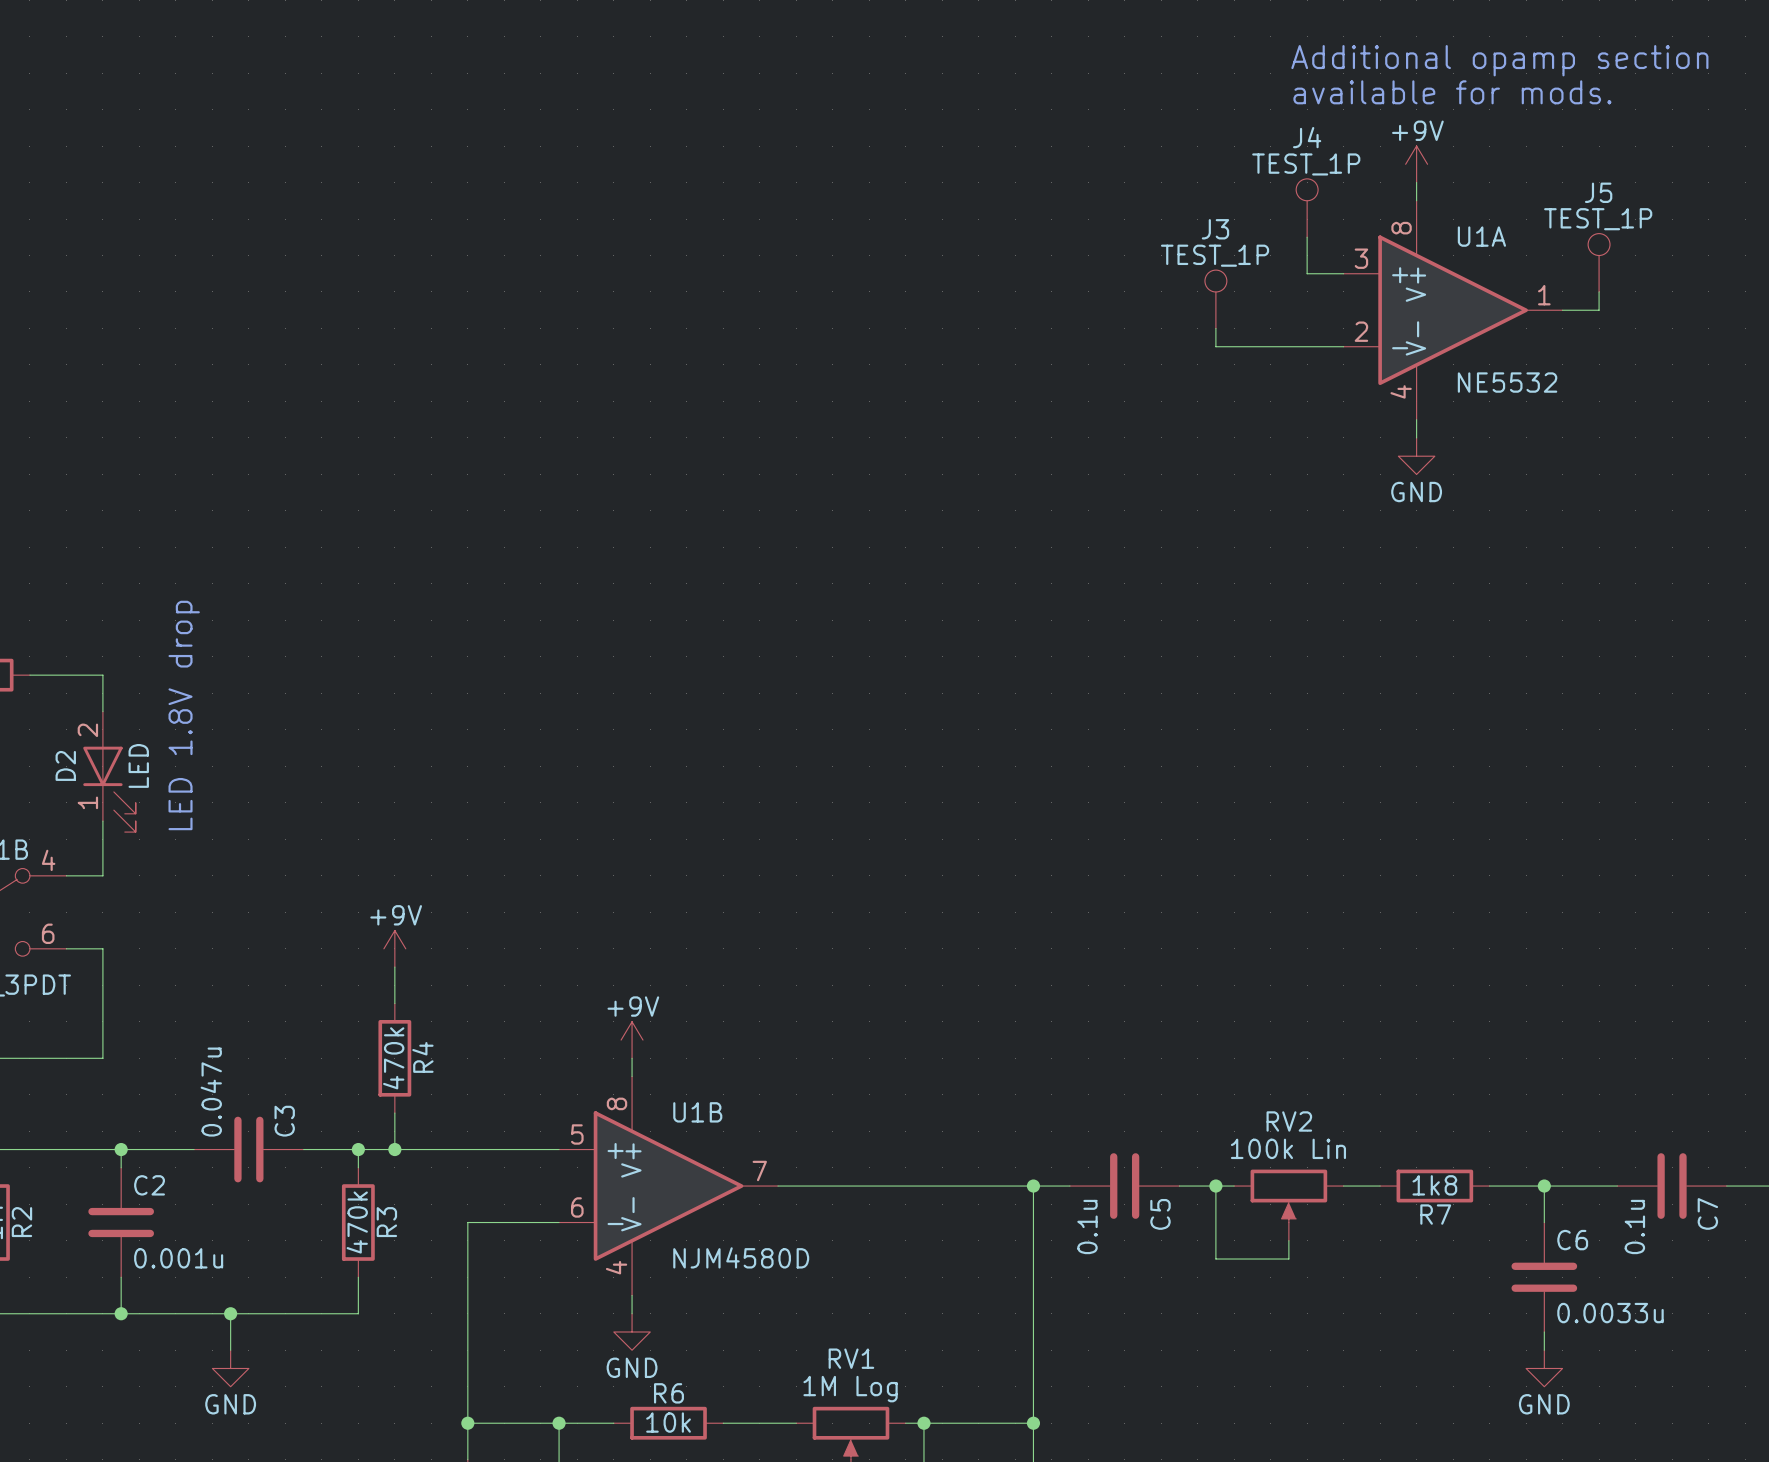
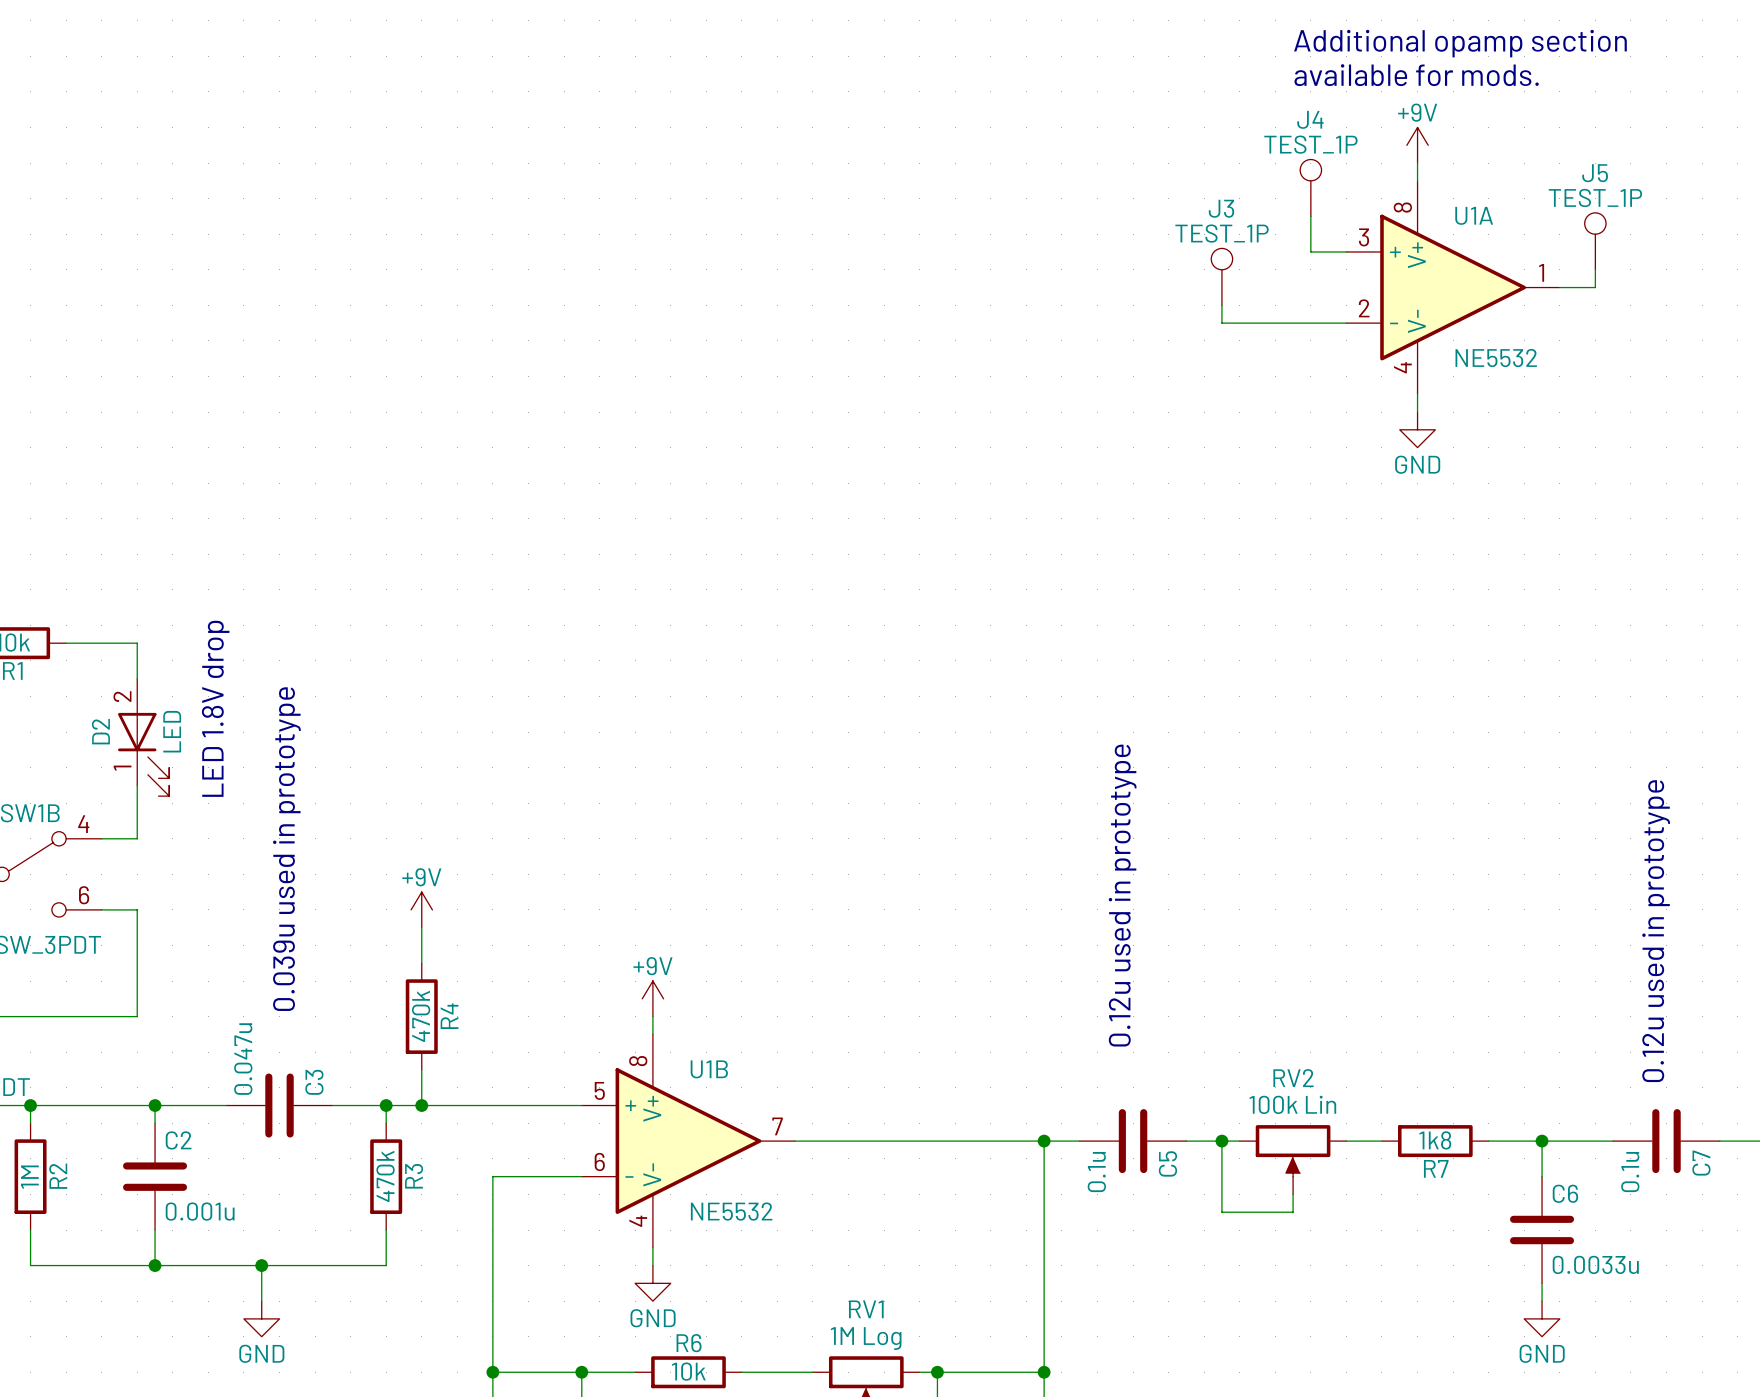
text: none -> 0.039u used in prototype (286, 849)
text: none -> 0.12u used in prototype (1122, 895)
text: none -> 0.12u used in prototype (1656, 931)
U1B value: NJM4580D (741, 1257) -> NE5532 (731, 1211)

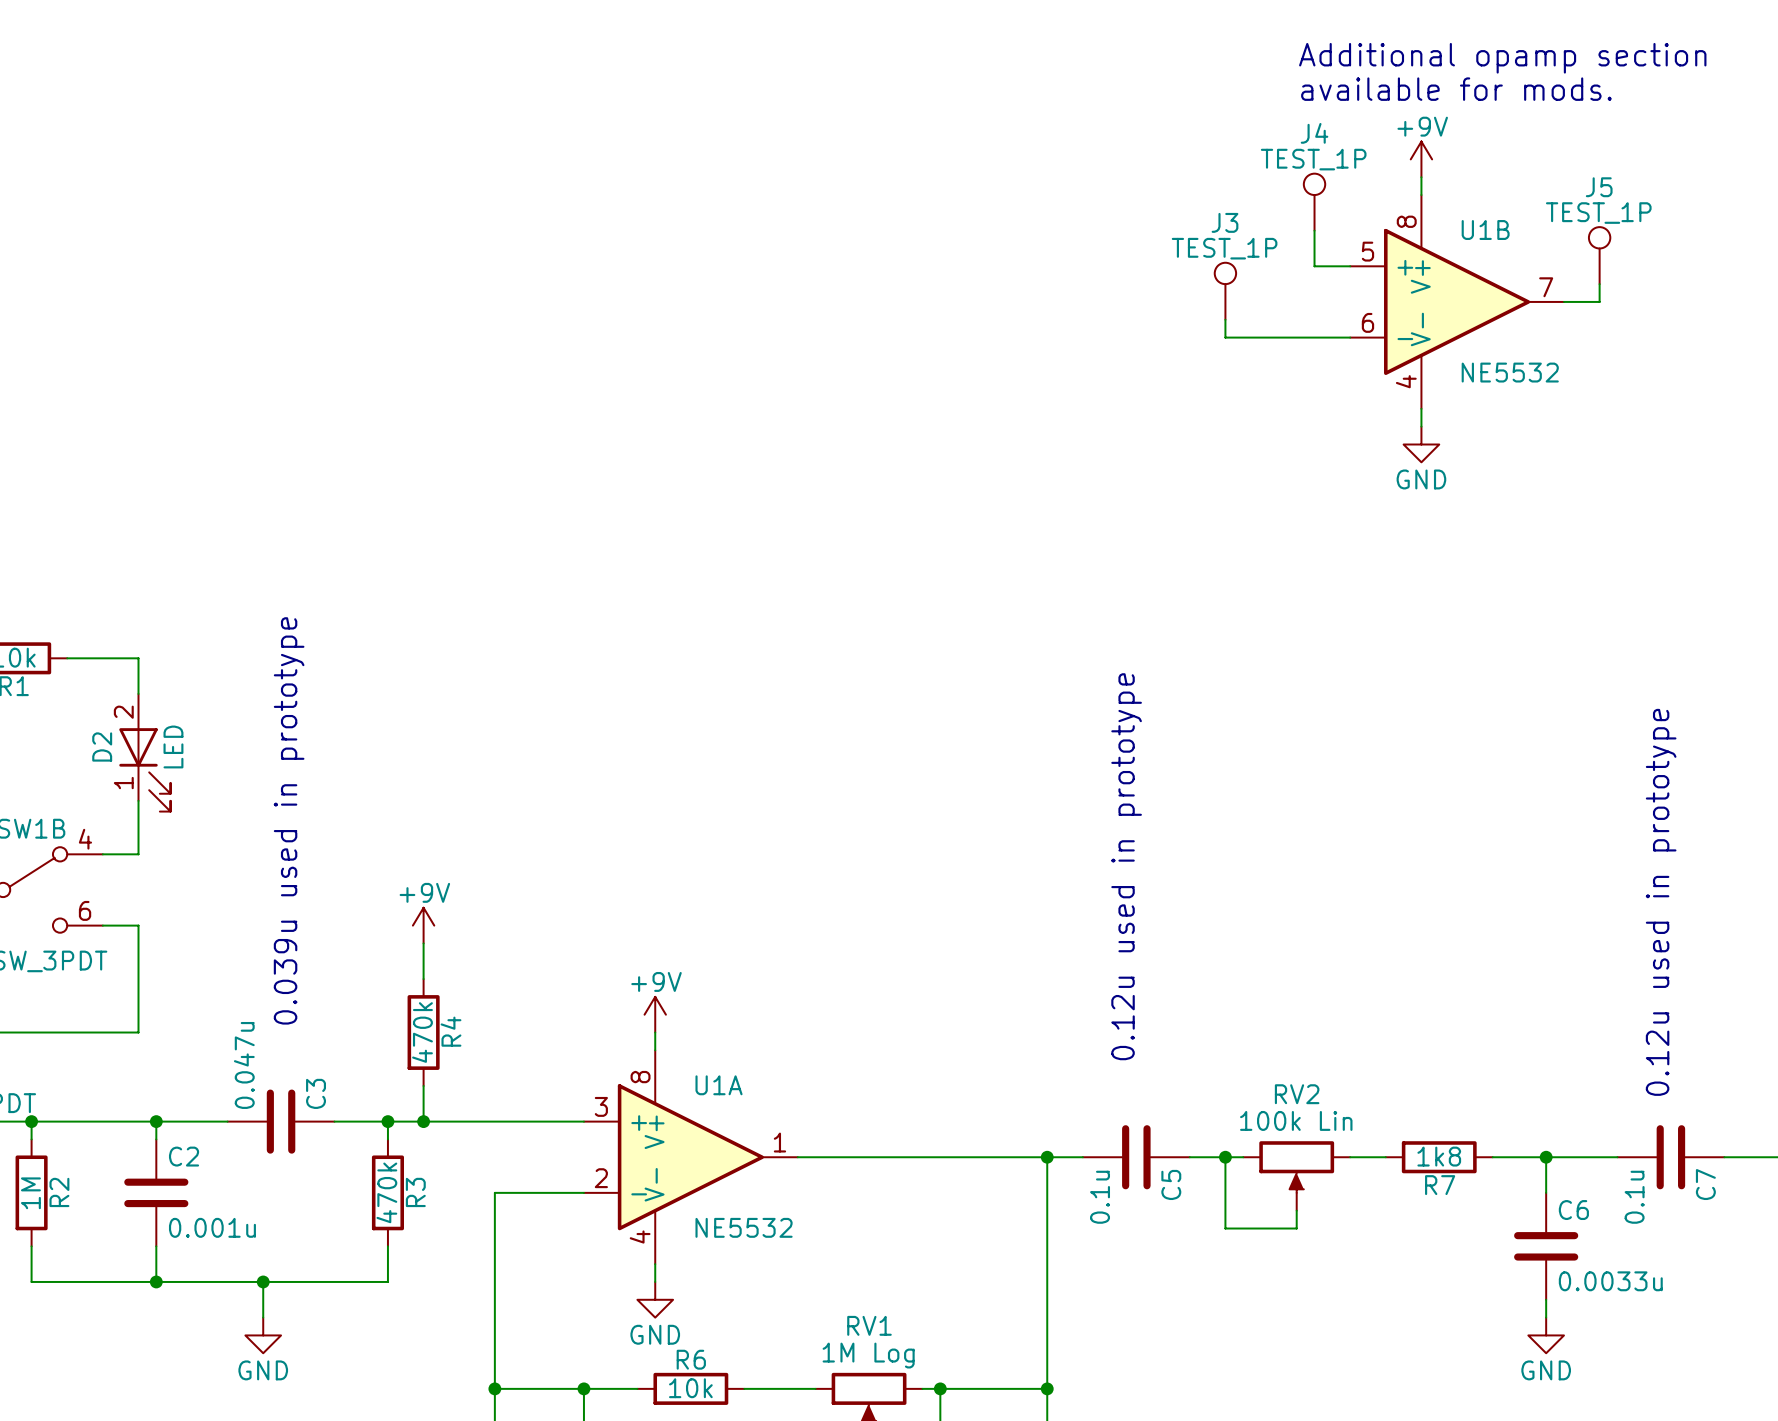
U1A position: (1453, 287) -> (690, 1157)
text: LED 1.8V drop (215, 708) -> none
U1B position: (688, 1141) -> (1457, 301)

